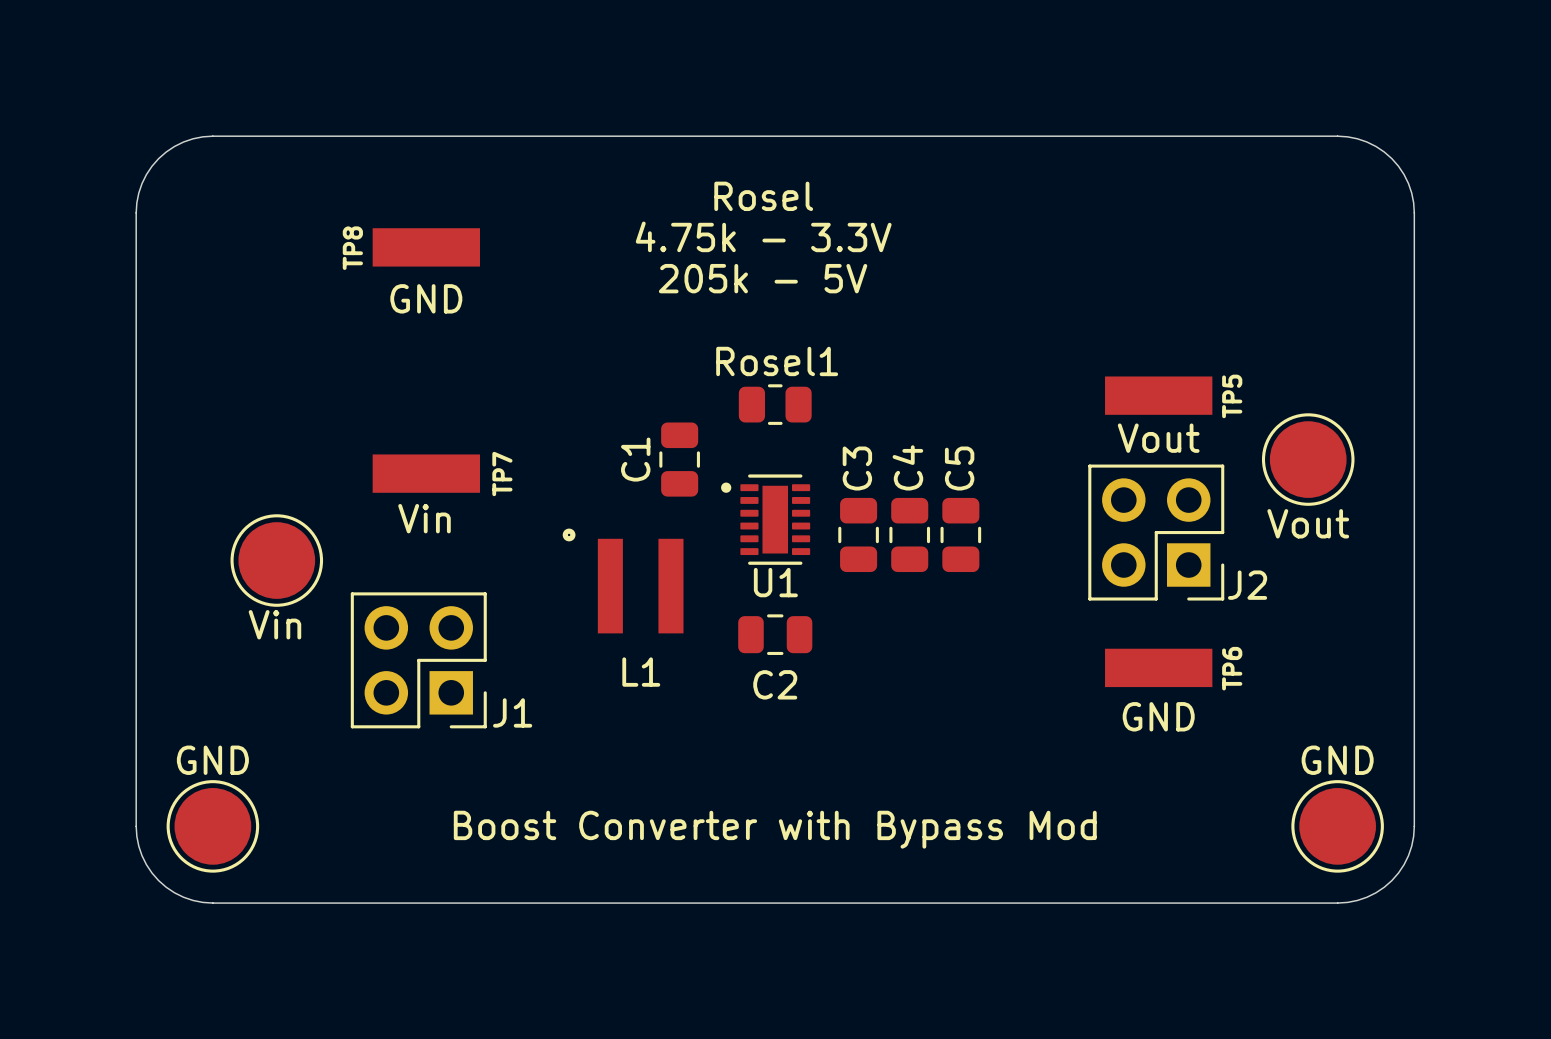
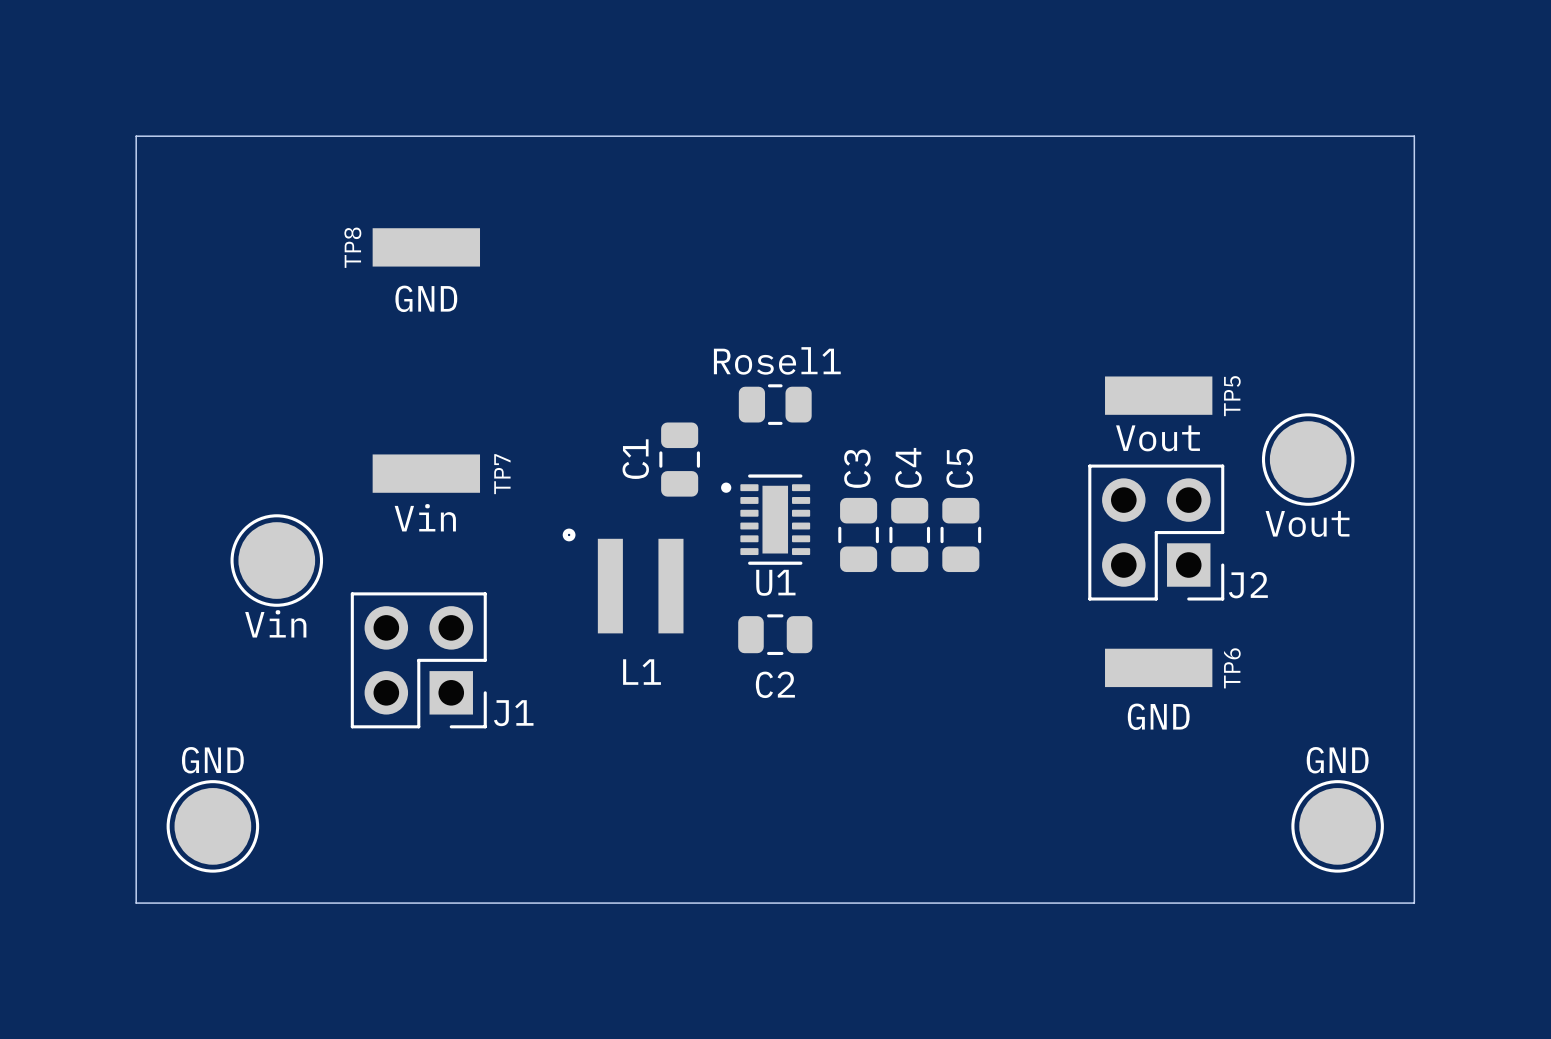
board edge: (212, 136) (183, 142) (158, 158) (142, 183) (136, 212) -> (212, 136) (136, 136) (136, 212)
board edge: (1337, 136) (1366, 142) (1391, 158) (1408, 183) (1414, 212) -> (1337, 136) (1414, 136) (1414, 212)
text: Rosel (763, 196) -> none
text: 4.75k - 3.3V (763, 236) -> none
text: 205k - 5V (763, 278) -> none
board edge: (136, 826) (142, 855) (158, 880) (183, 897) (212, 903) -> (136, 826) (136, 903) (212, 903)
board edge: (1414, 826) (1408, 855) (1391, 880) (1366, 897) (1337, 903) -> (1414, 826) (1414, 903) (1337, 903)
text: Boost Converter with Bypass Mod (775, 829) -> none

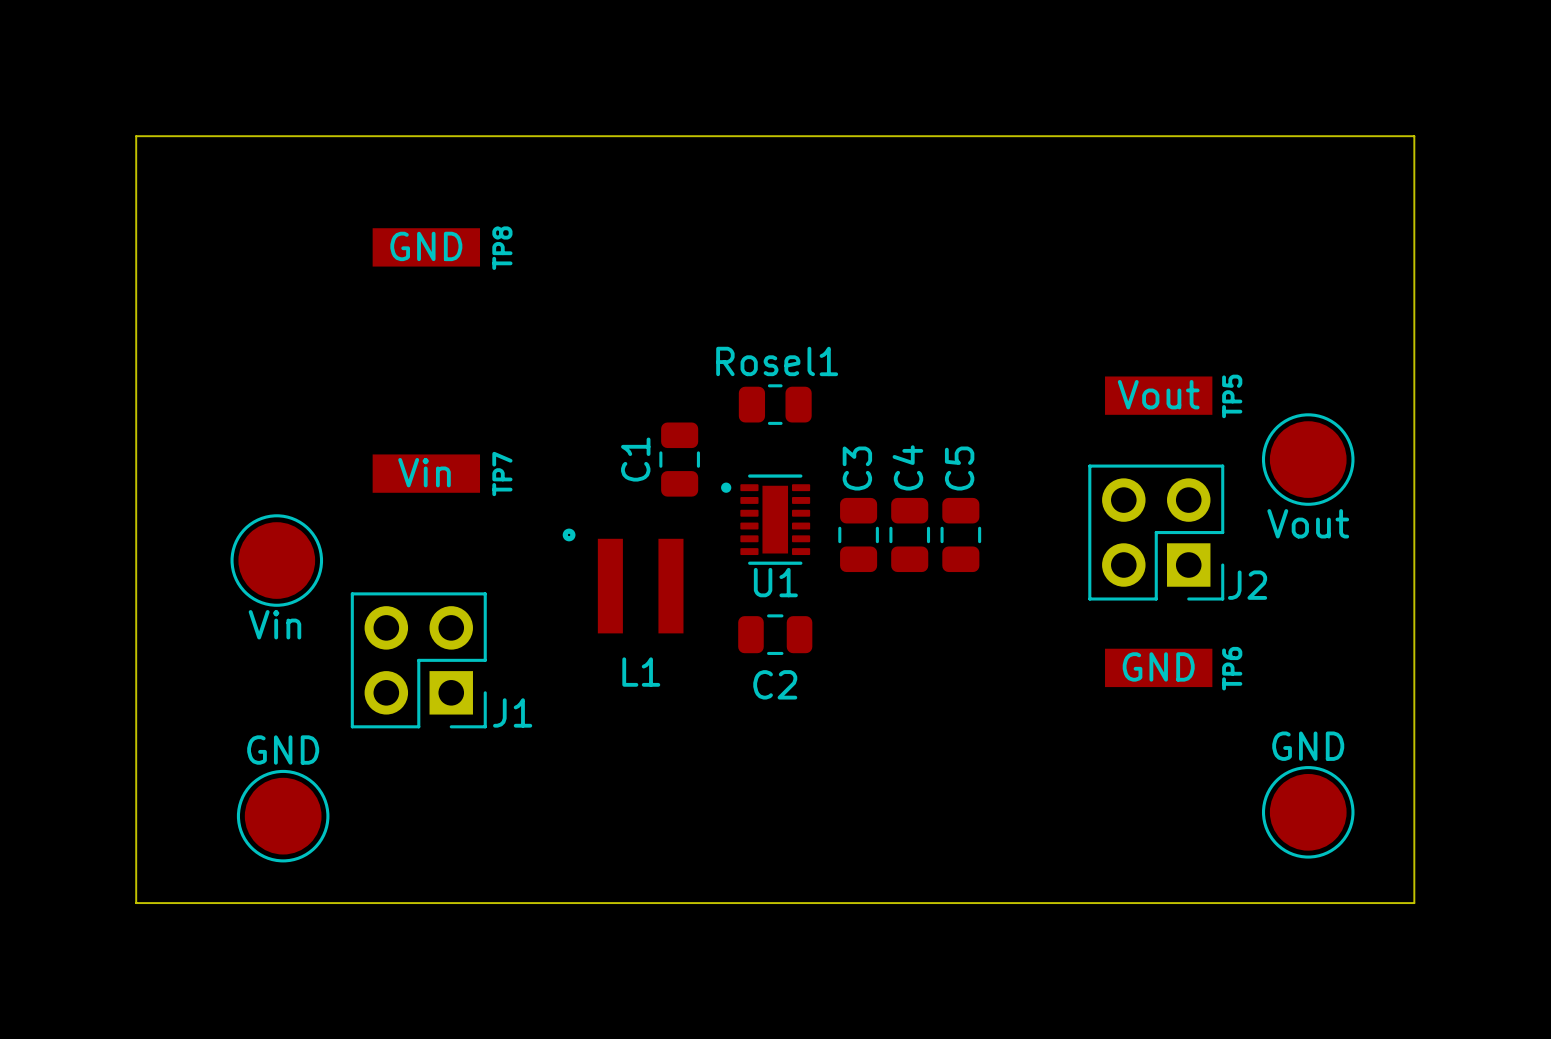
TP8 name position: TP8 (352, 247) -> TP8 (502, 248)
TP8 text position: GND (426, 298) -> GND (426, 246)
TP5 text position: Vout (1158, 438) -> Vout (1158, 394)
TP7 text position: Vin (425, 517) -> Vin (424, 472)
TP6 text position: GND (1158, 716) -> GND (1158, 666)
part position: (212, 826) -> (283, 816)
part position: (1337, 826) -> (1308, 812)

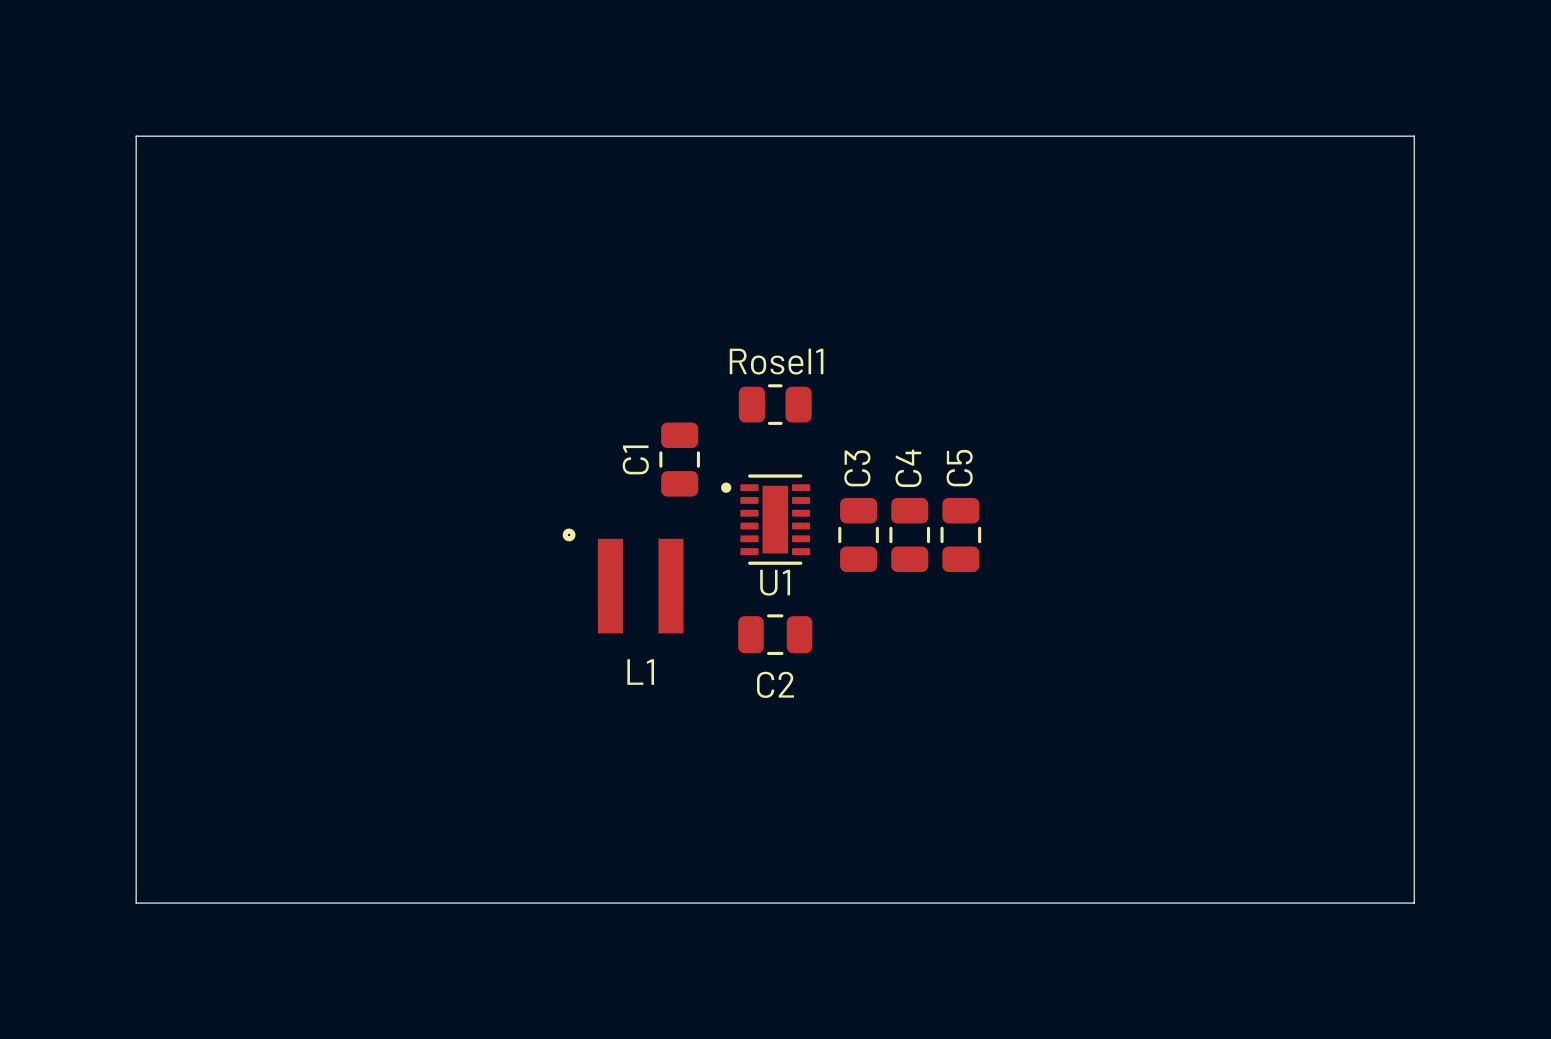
TP8: (426, 247) -> none
TP5: (1158, 395) -> none
part: Vout (1308, 459) -> none
TP7: (426, 473) -> none
J2: (1156, 532) -> none
part: Vin (276, 560) -> none
J1: (418, 660) -> none
TP6: (1158, 667) -> none
part: GND (1308, 812) -> none
part: GND (283, 816) -> none

